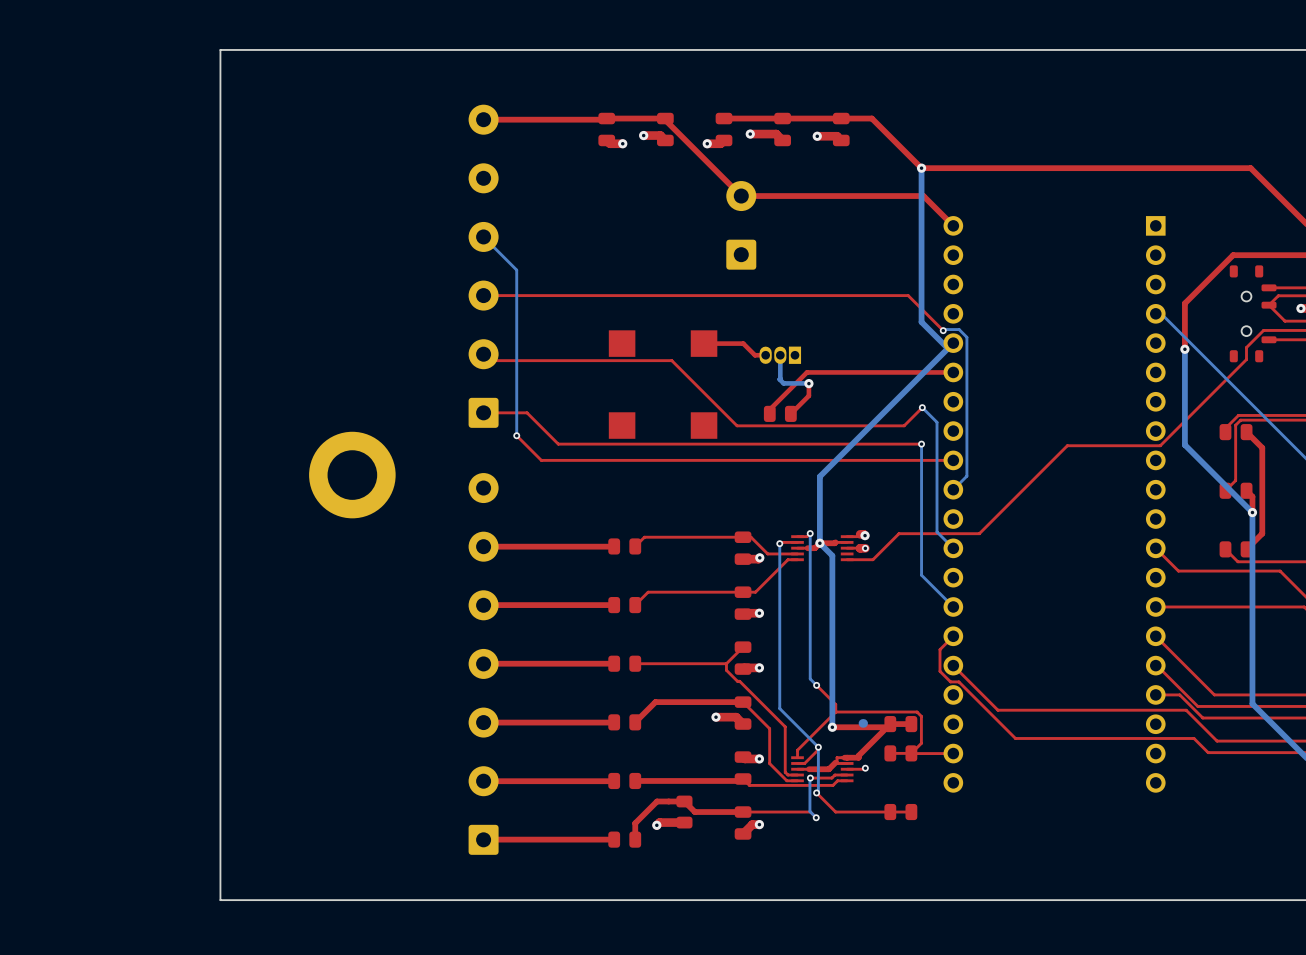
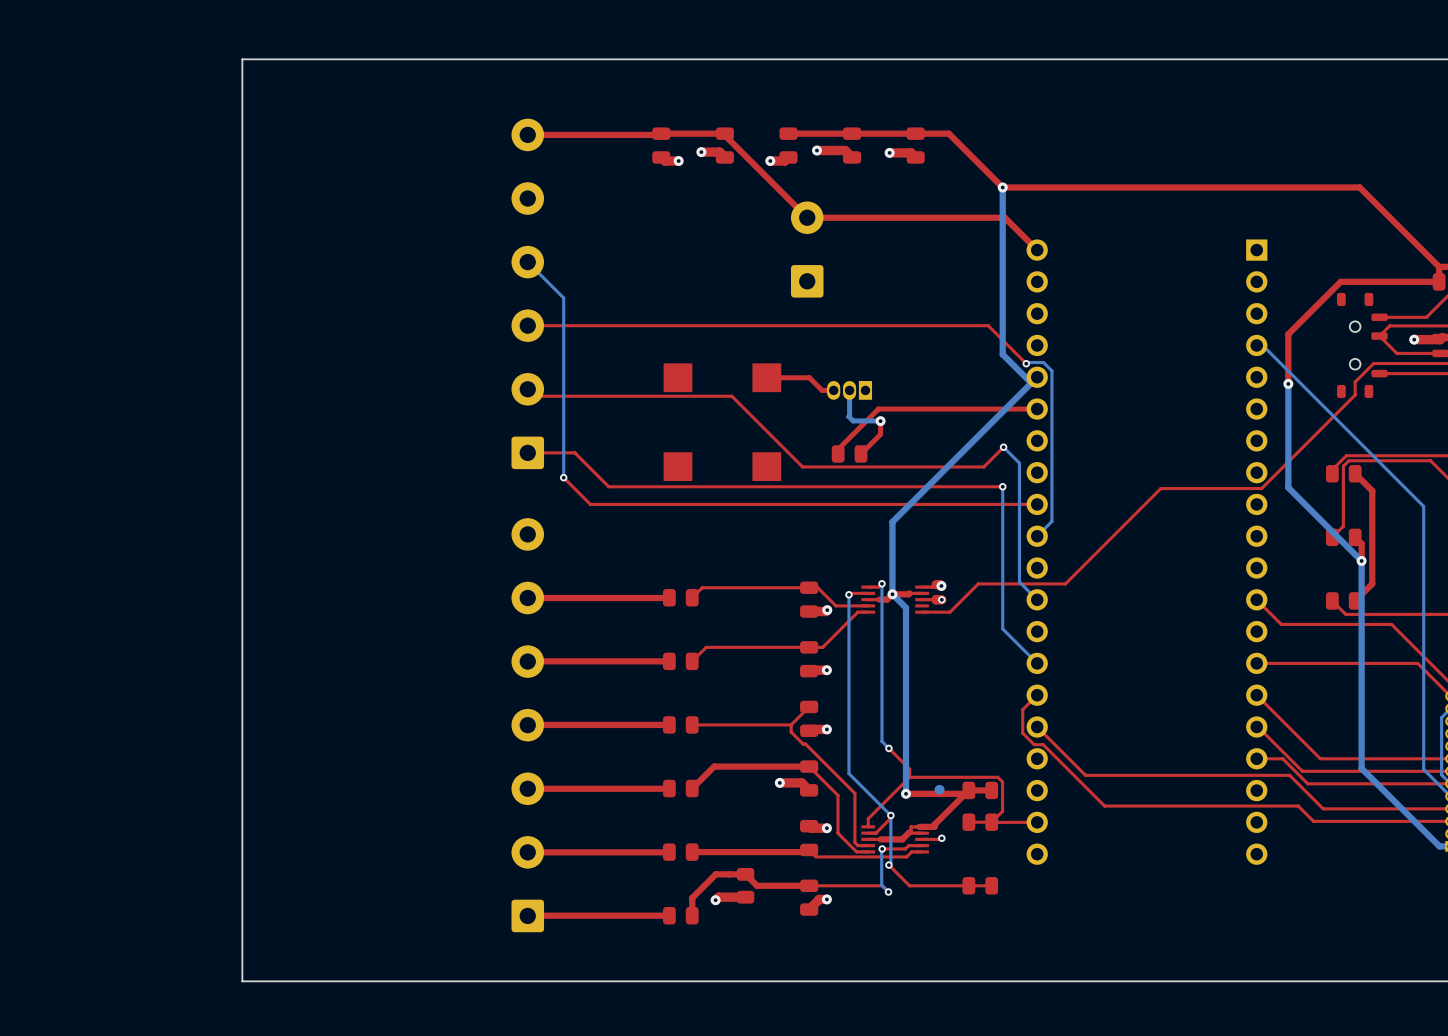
part: (352, 475) -> none

